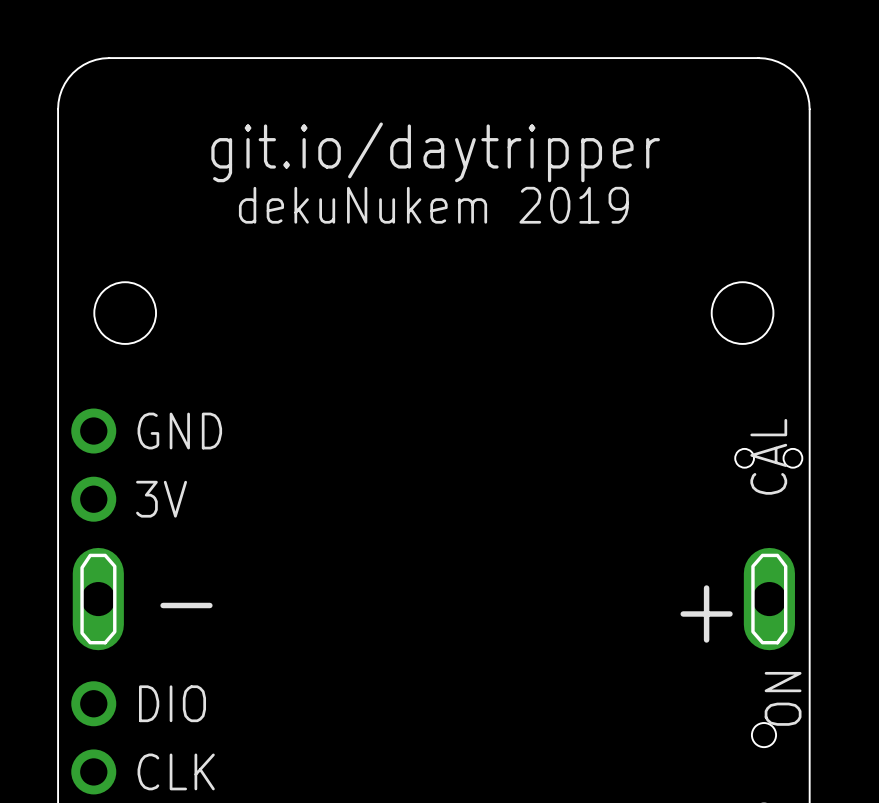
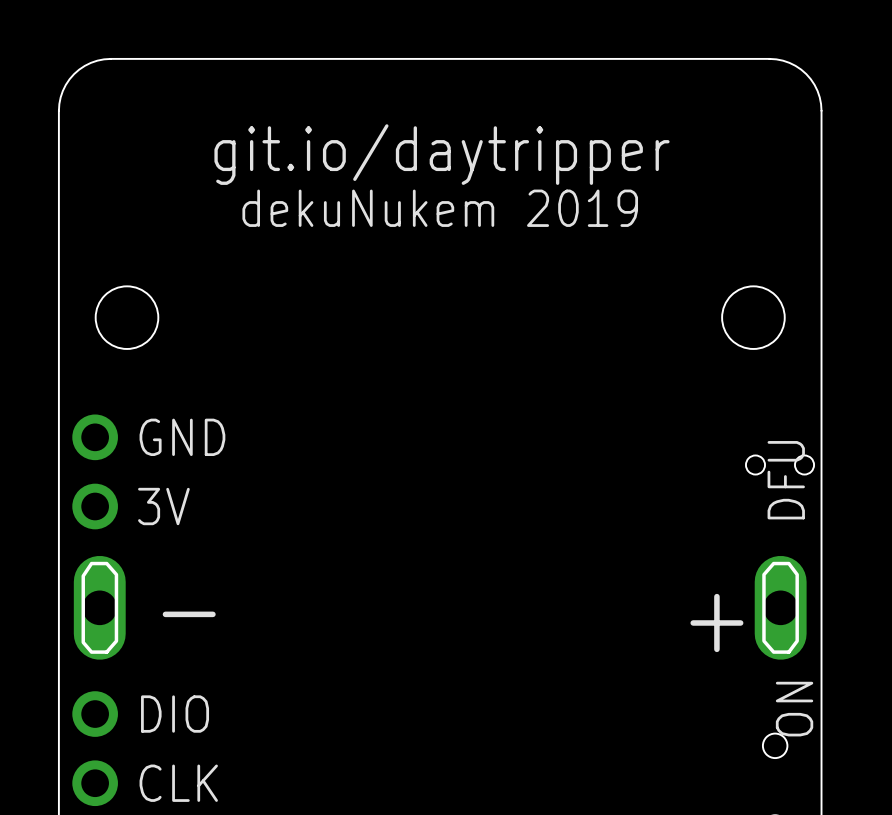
text: CAL (768, 456) -> none
text: none -> DFU (786, 480)

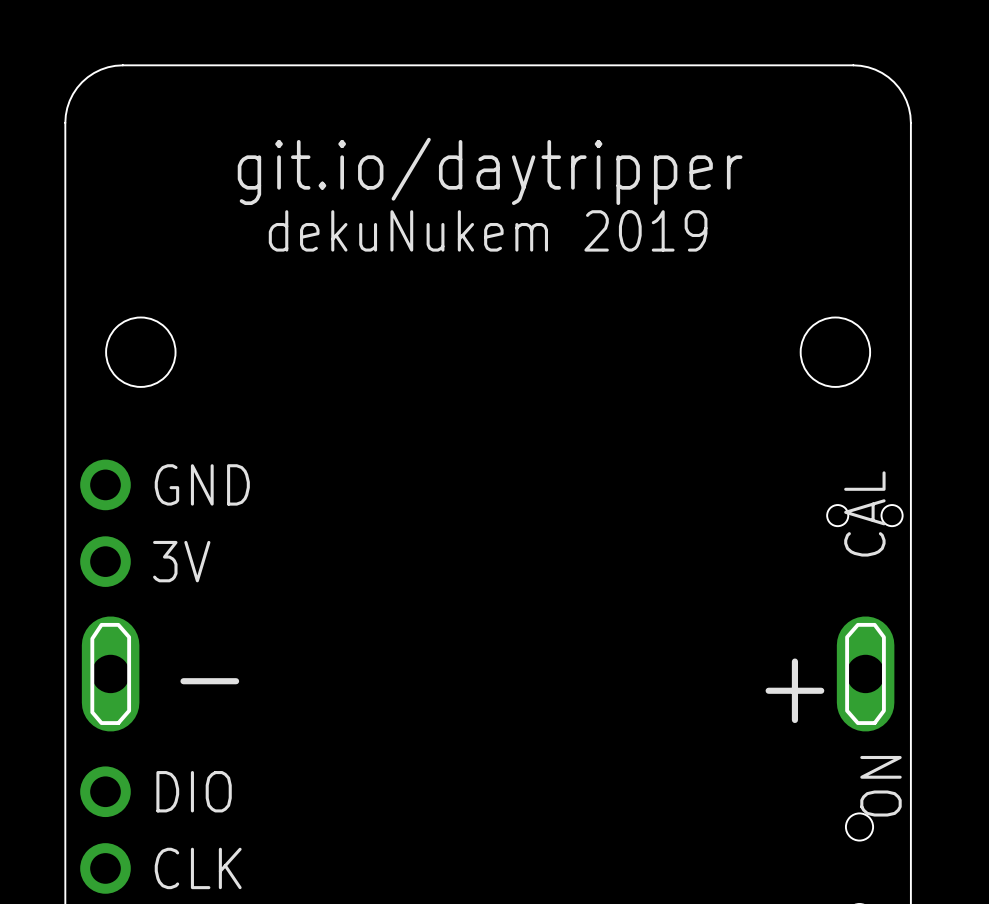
text: none -> CAL (864, 513)
text: DFU (786, 480) -> none

